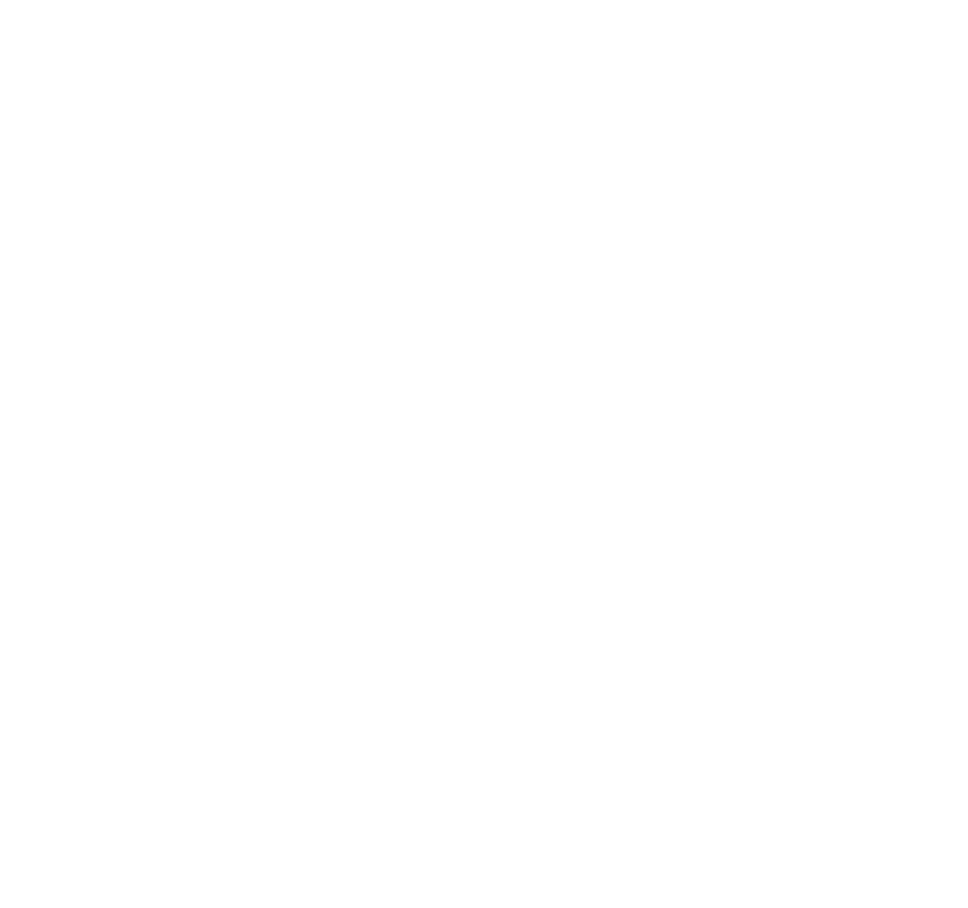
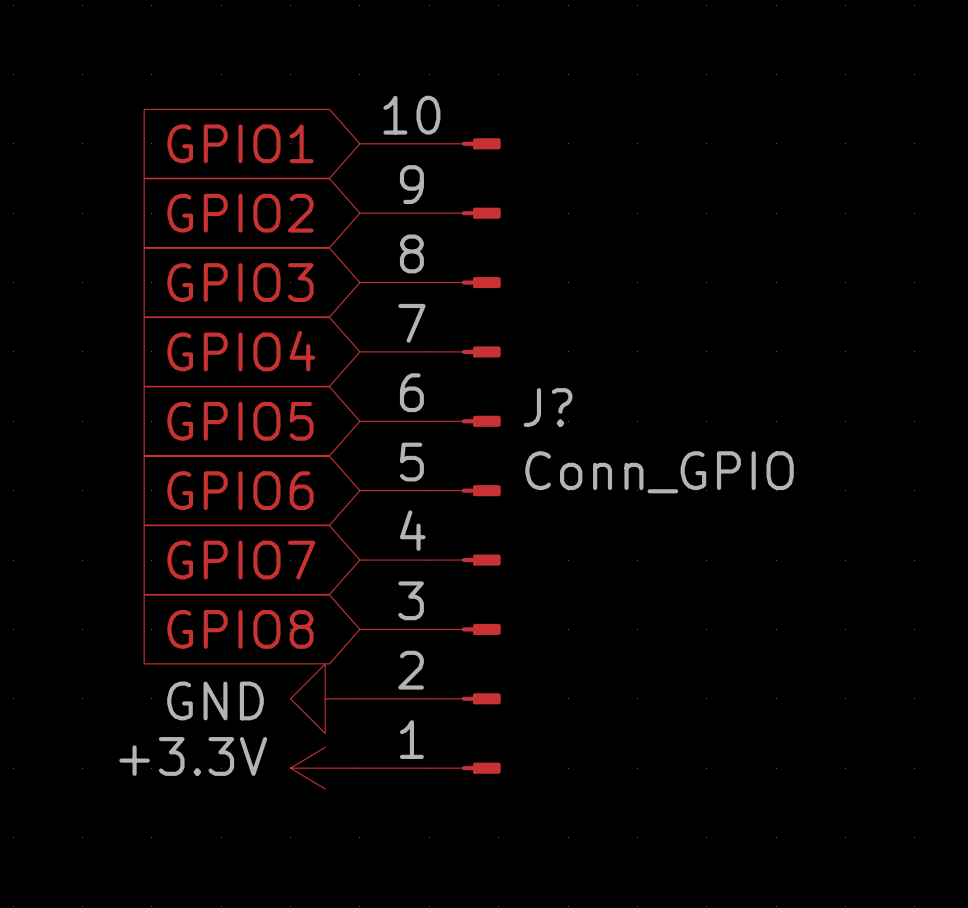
global label: none -> GPIO1 (240, 143)
global label: none -> GPIO2 (240, 213)
global label: none -> GPIO3 (240, 282)
global label: none -> GPIO4 (241, 351)
global label: none -> GPIO5 (240, 421)
J?: none -> Conn_GPIO (430, 455)
global label: none -> GPIO6 (240, 490)
global label: none -> GPIO7 (241, 560)
global label: none -> GPIO8 (240, 629)
power symbol: none -> GND (325, 698)
power symbol: none -> +3.3V (325, 768)

